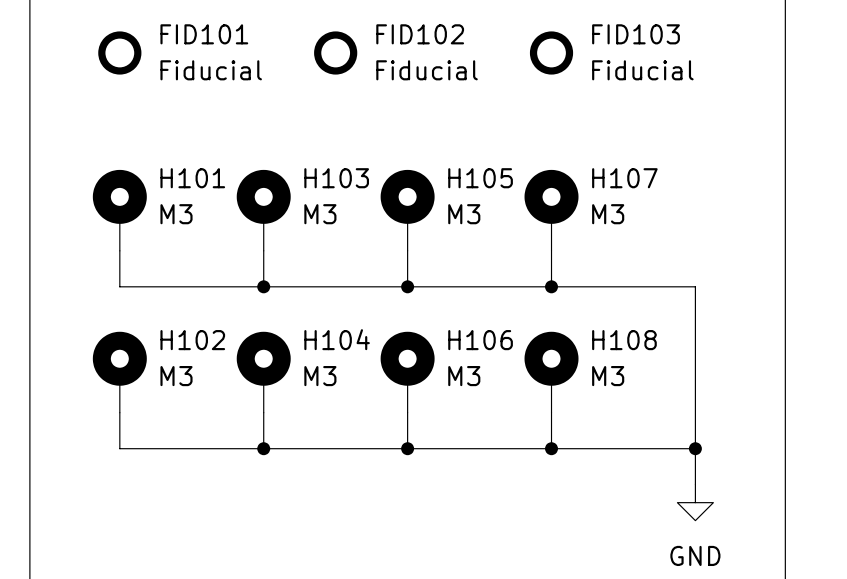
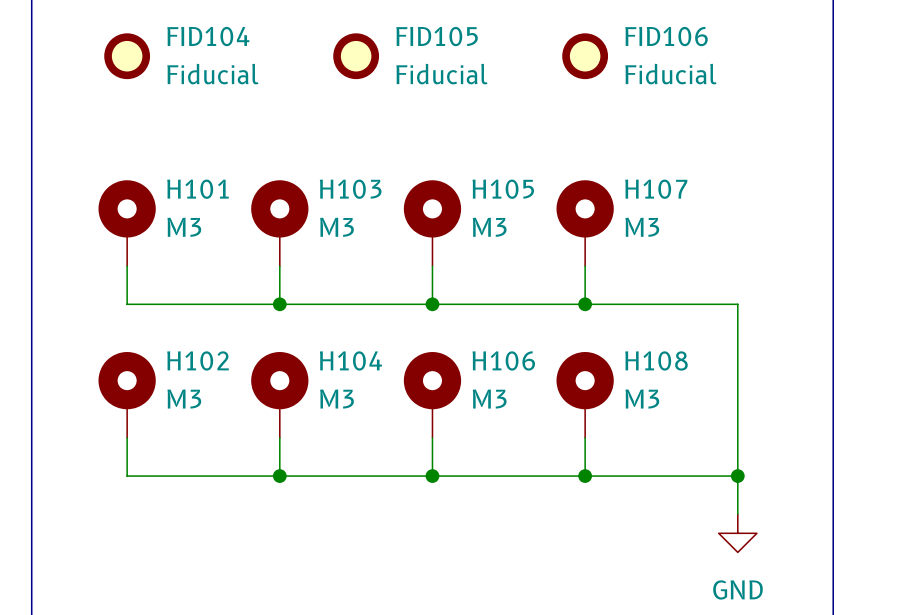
FID101 name: FID101 (204, 34) -> FID104 (208, 36)
FID102 name: FID102 (420, 34) -> FID105 (437, 36)
FID103 name: FID103 (636, 34) -> FID106 (666, 36)

